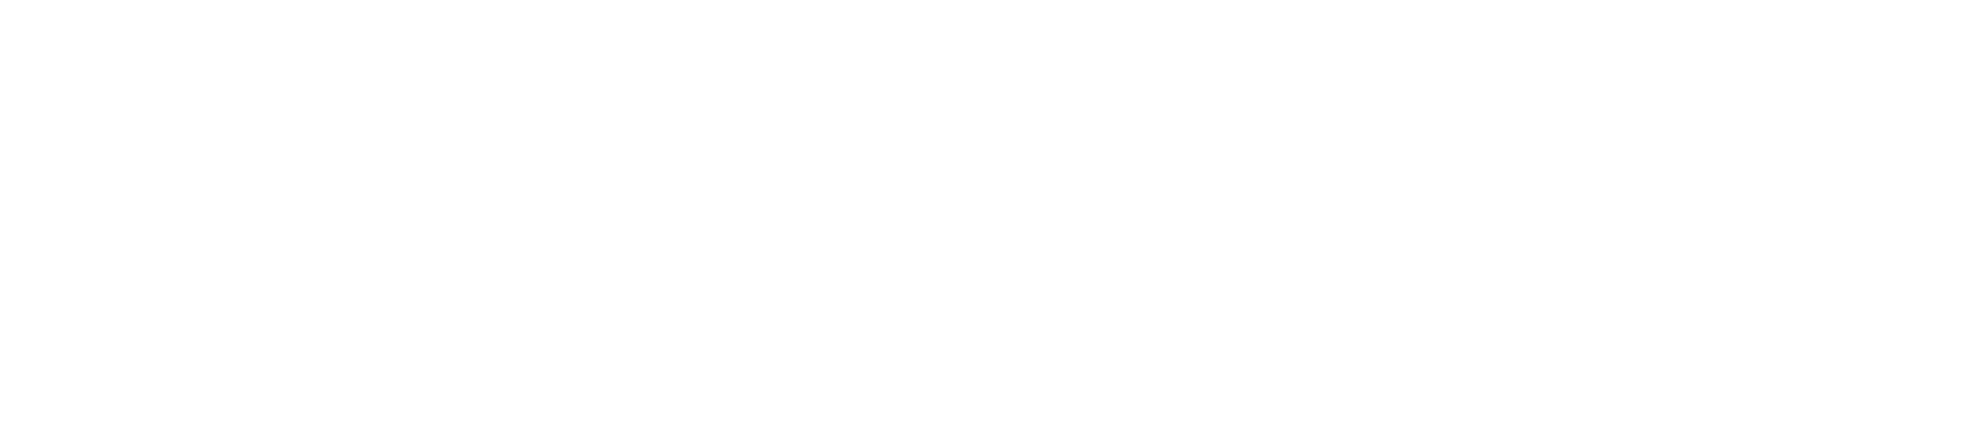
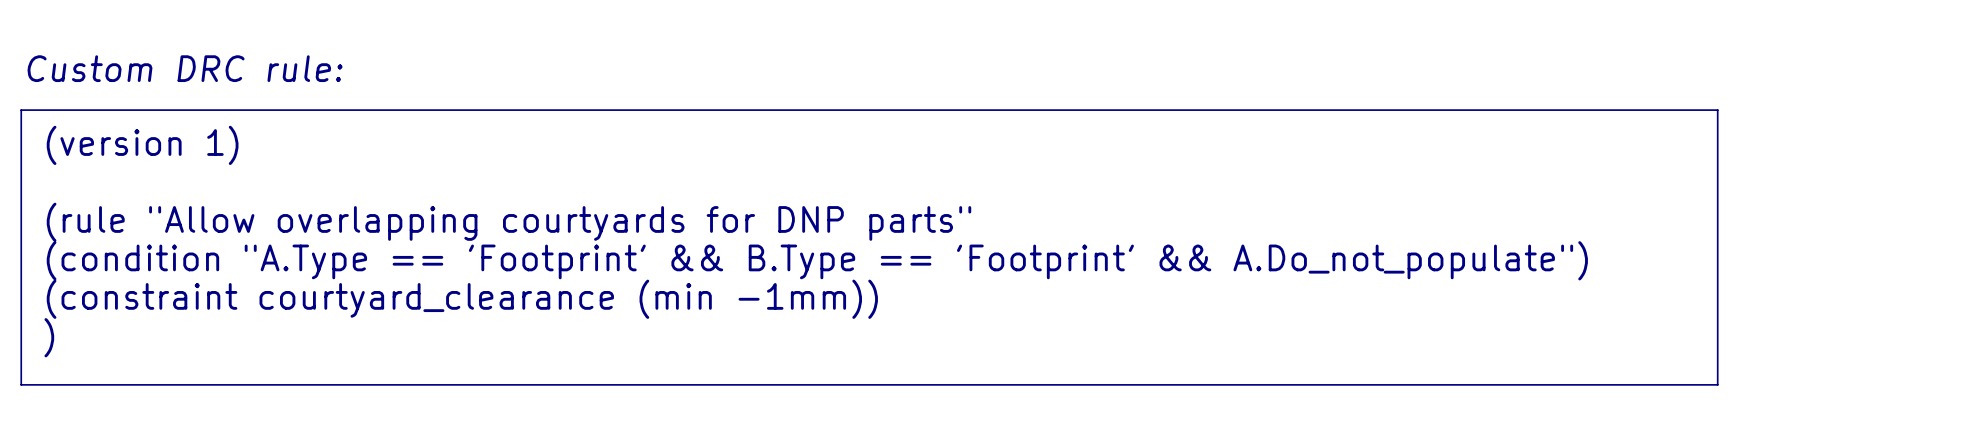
text: none -> Custom DRC rule: (185, 68)
line: none -> (21, 110) (1717, 110) (1717, 384) (21, 384) (21, 110)
text: none -> (version 1) (142, 145)
text: none -> (rule "Allow overlapping courtyards for DNP parts" (508, 222)
text: none -> (condition "A.Type == 'Footprint' && B.Type == 'Footprint' && A.Do_not_populate") (817, 260)
text: none -> (constraint courtyard_clearance (min -1mm)) (462, 299)
text: none -> ) (49, 337)

